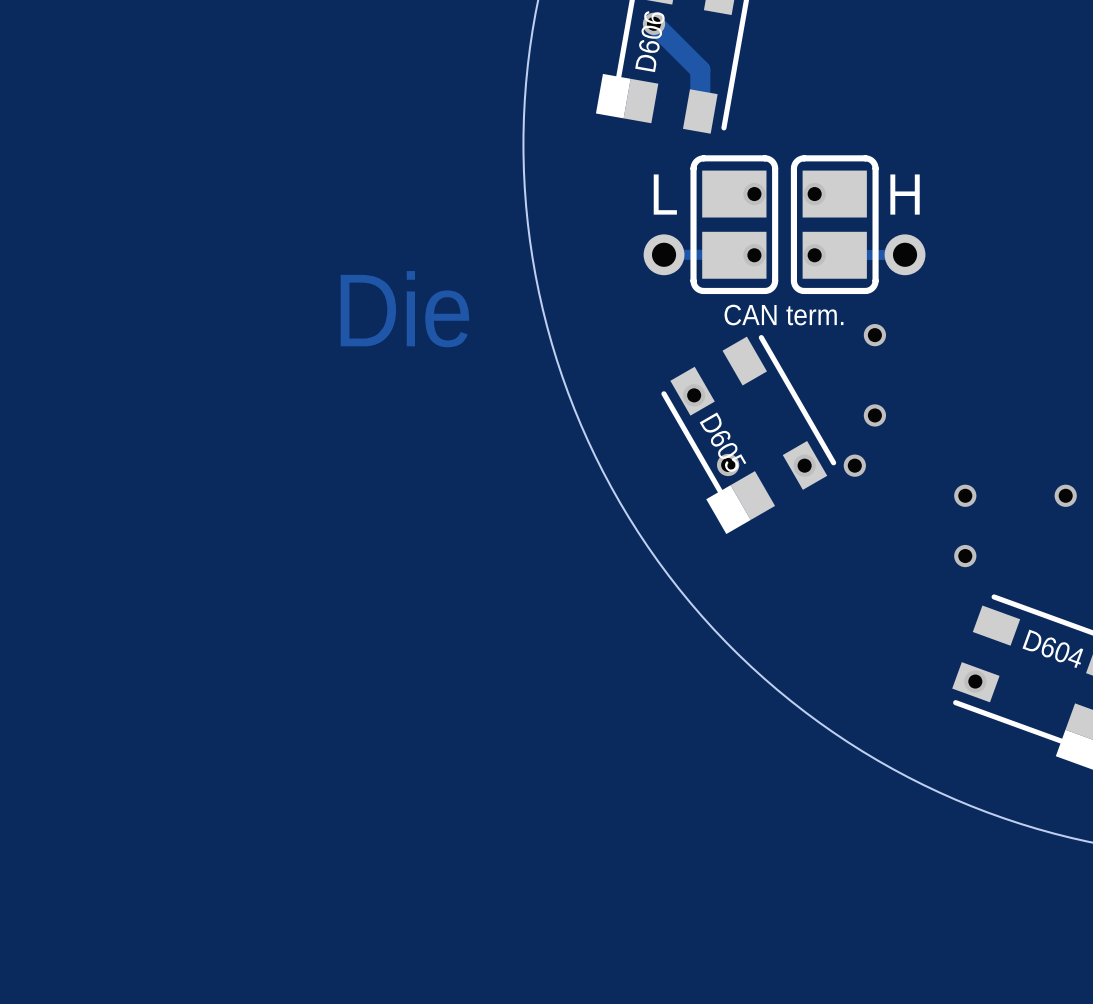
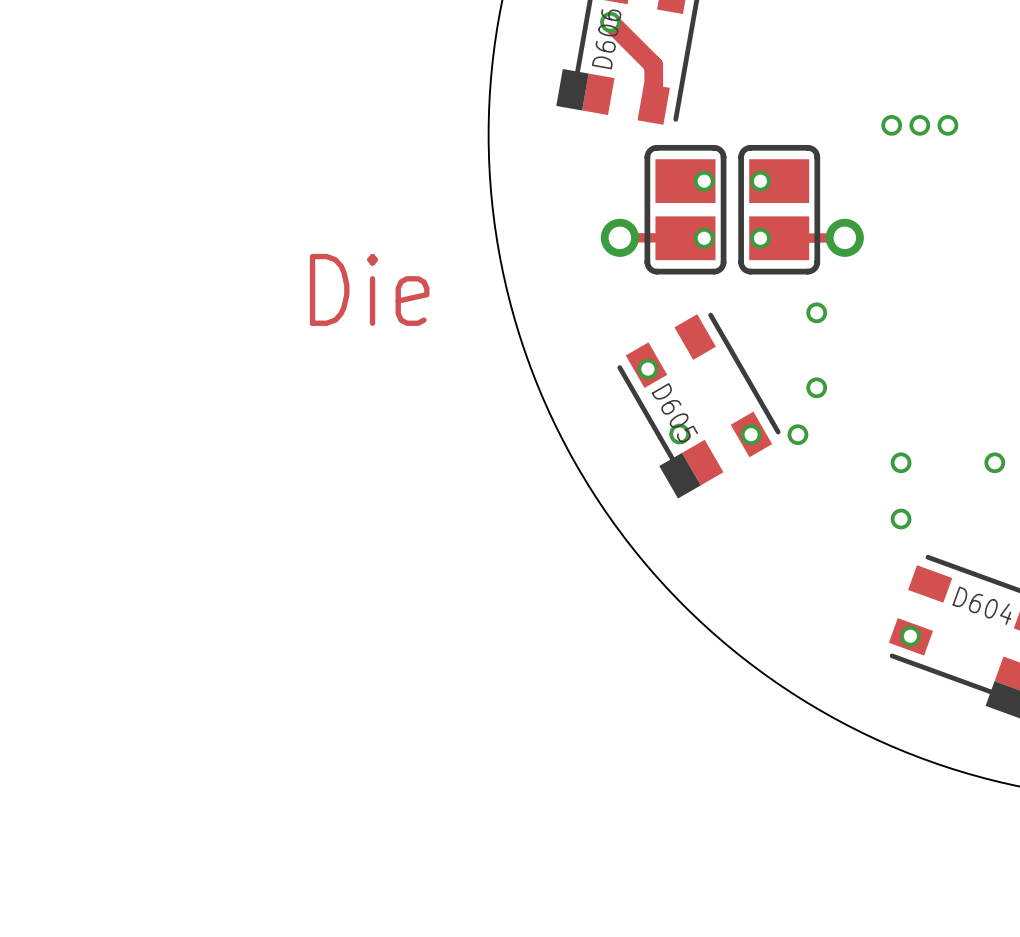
via: none -> (891, 125)
via: none -> (919, 125)
via: none -> (947, 125)
text: L (665, 194) -> none
text: H (905, 194) -> none
text: CAN term. (784, 315) -> none

